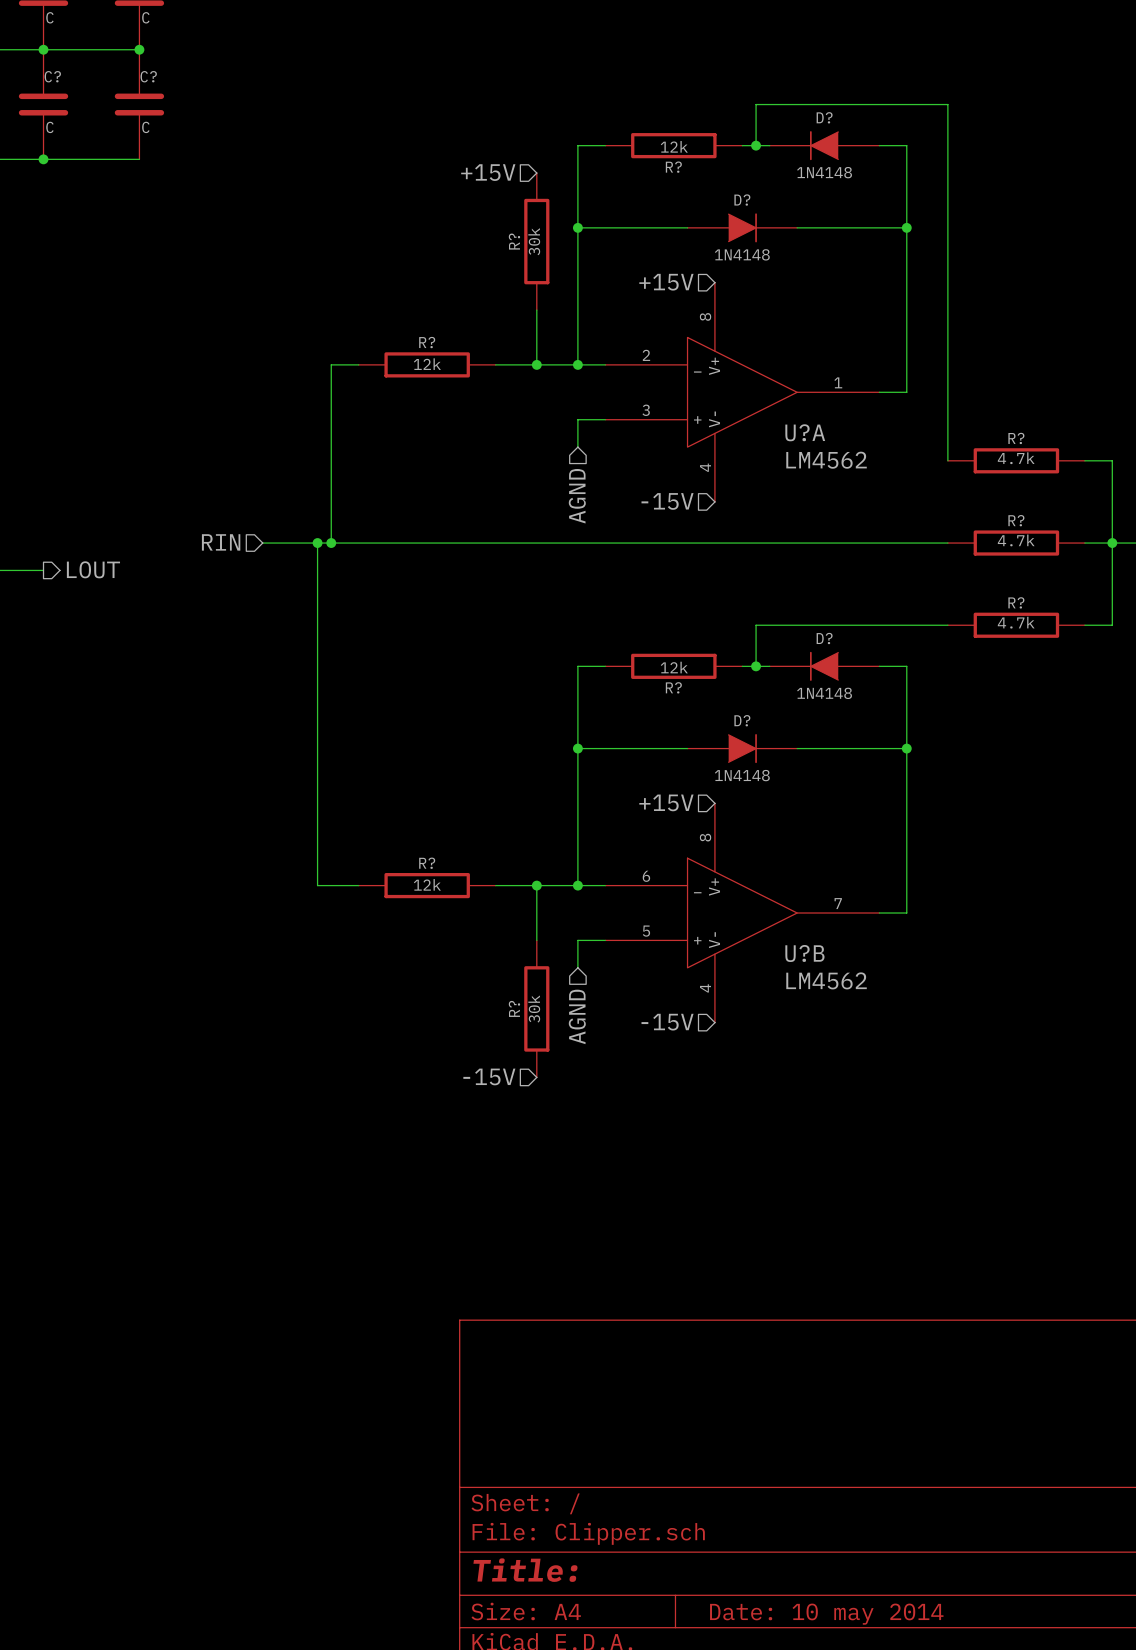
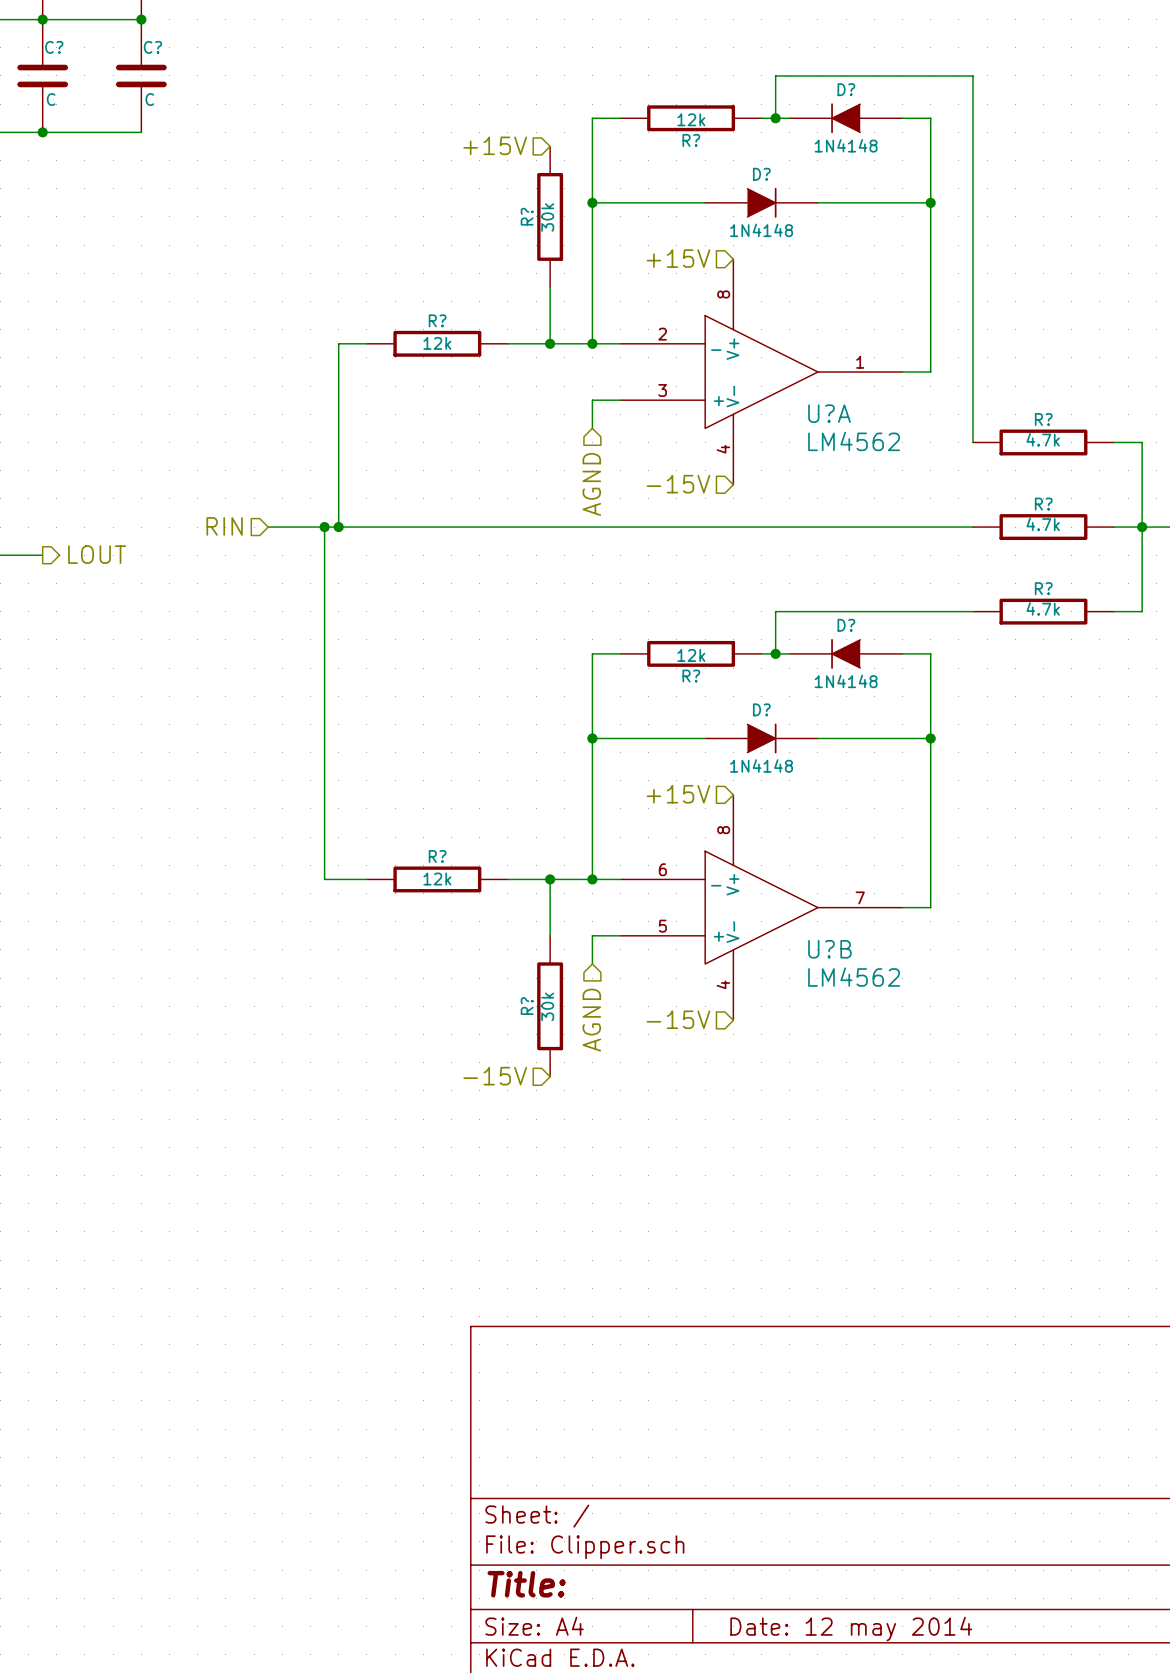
title block: Date: 10 may 2014 (826, 1614) -> Date: 12 may 2014 (851, 1629)

